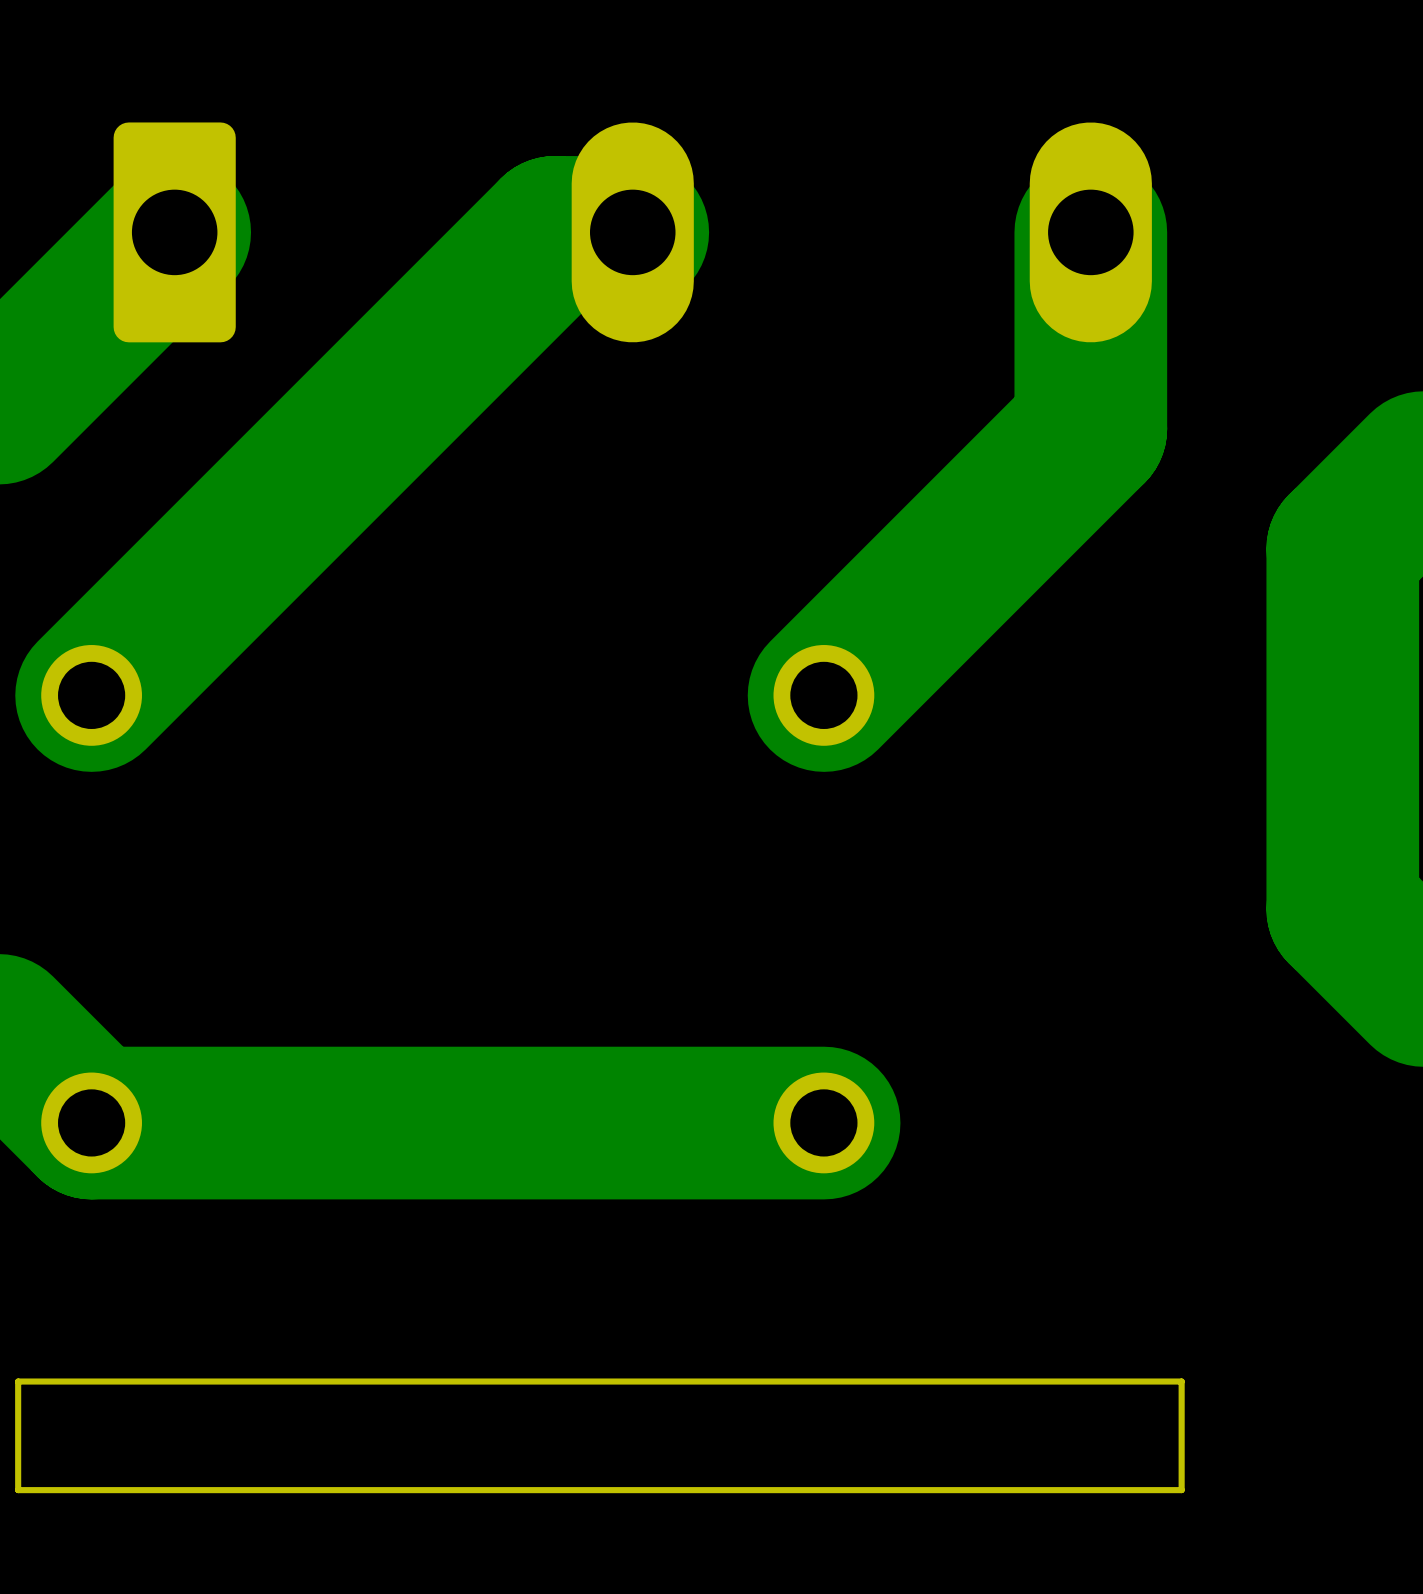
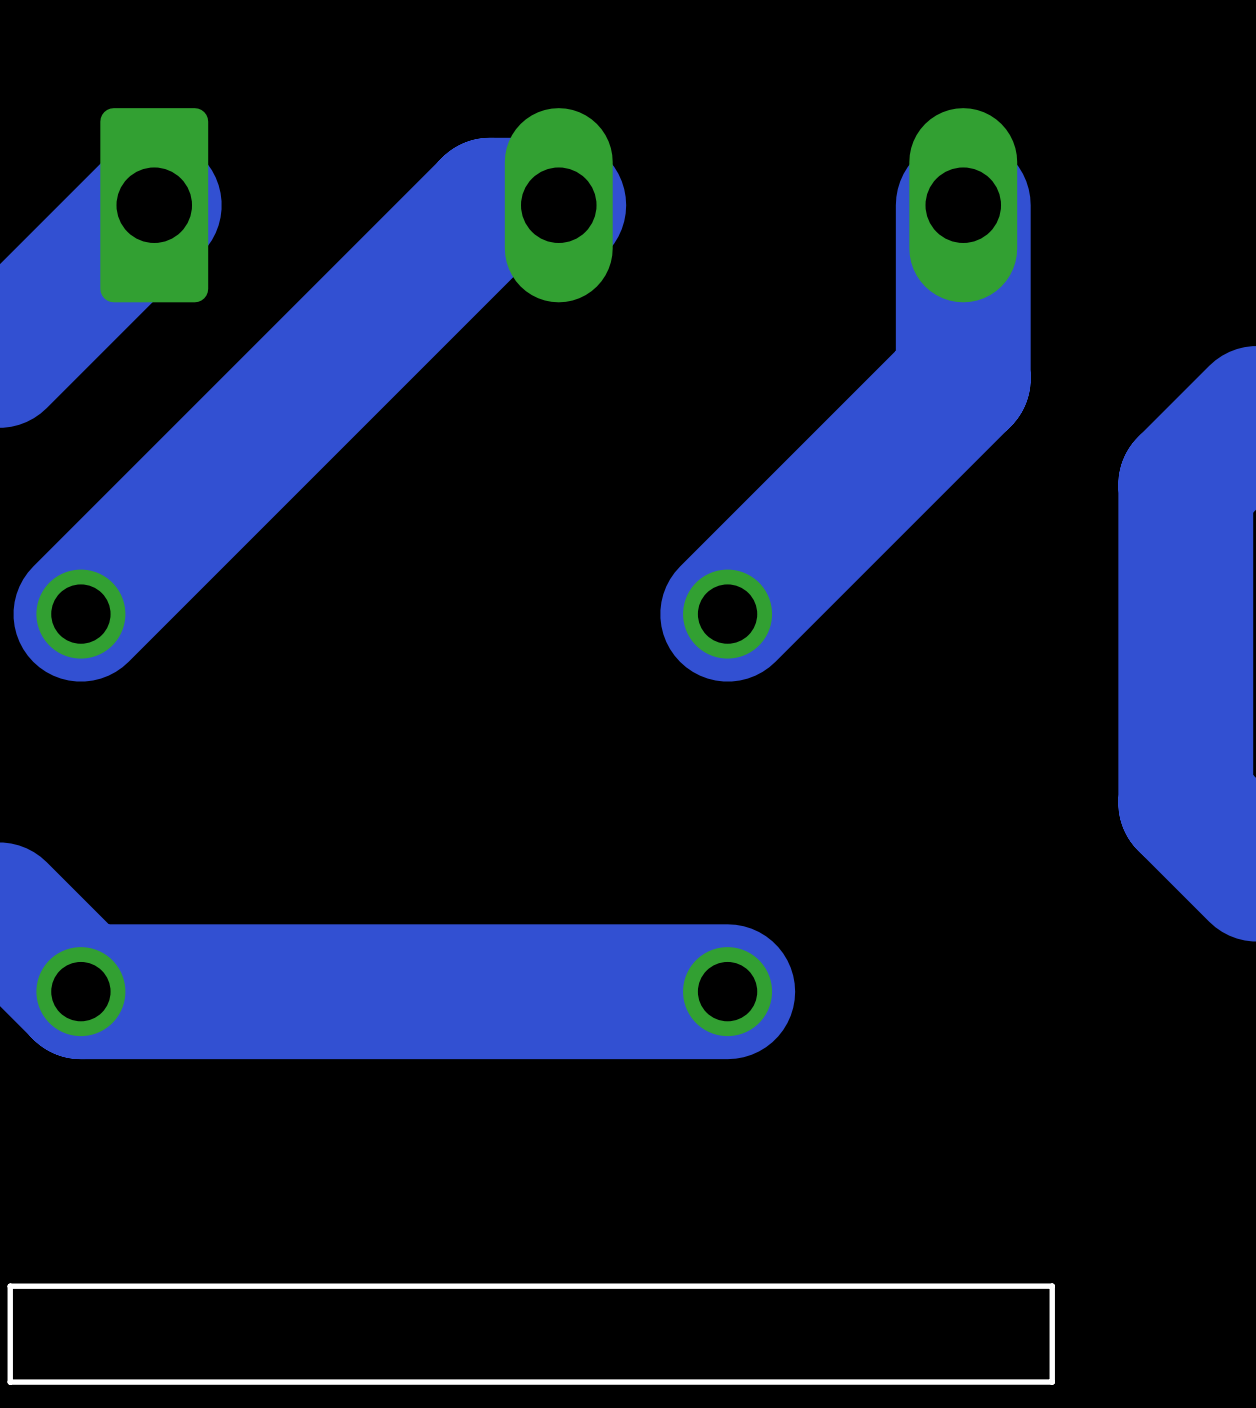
board edge: (1181, 1381) (1181, 1490) (18, 1490) (18, 1381) (1181, 1381) -> none
board edge: none -> (1052, 1286) (10, 1286) (10, 1382) (1052, 1382) (1052, 1286)

